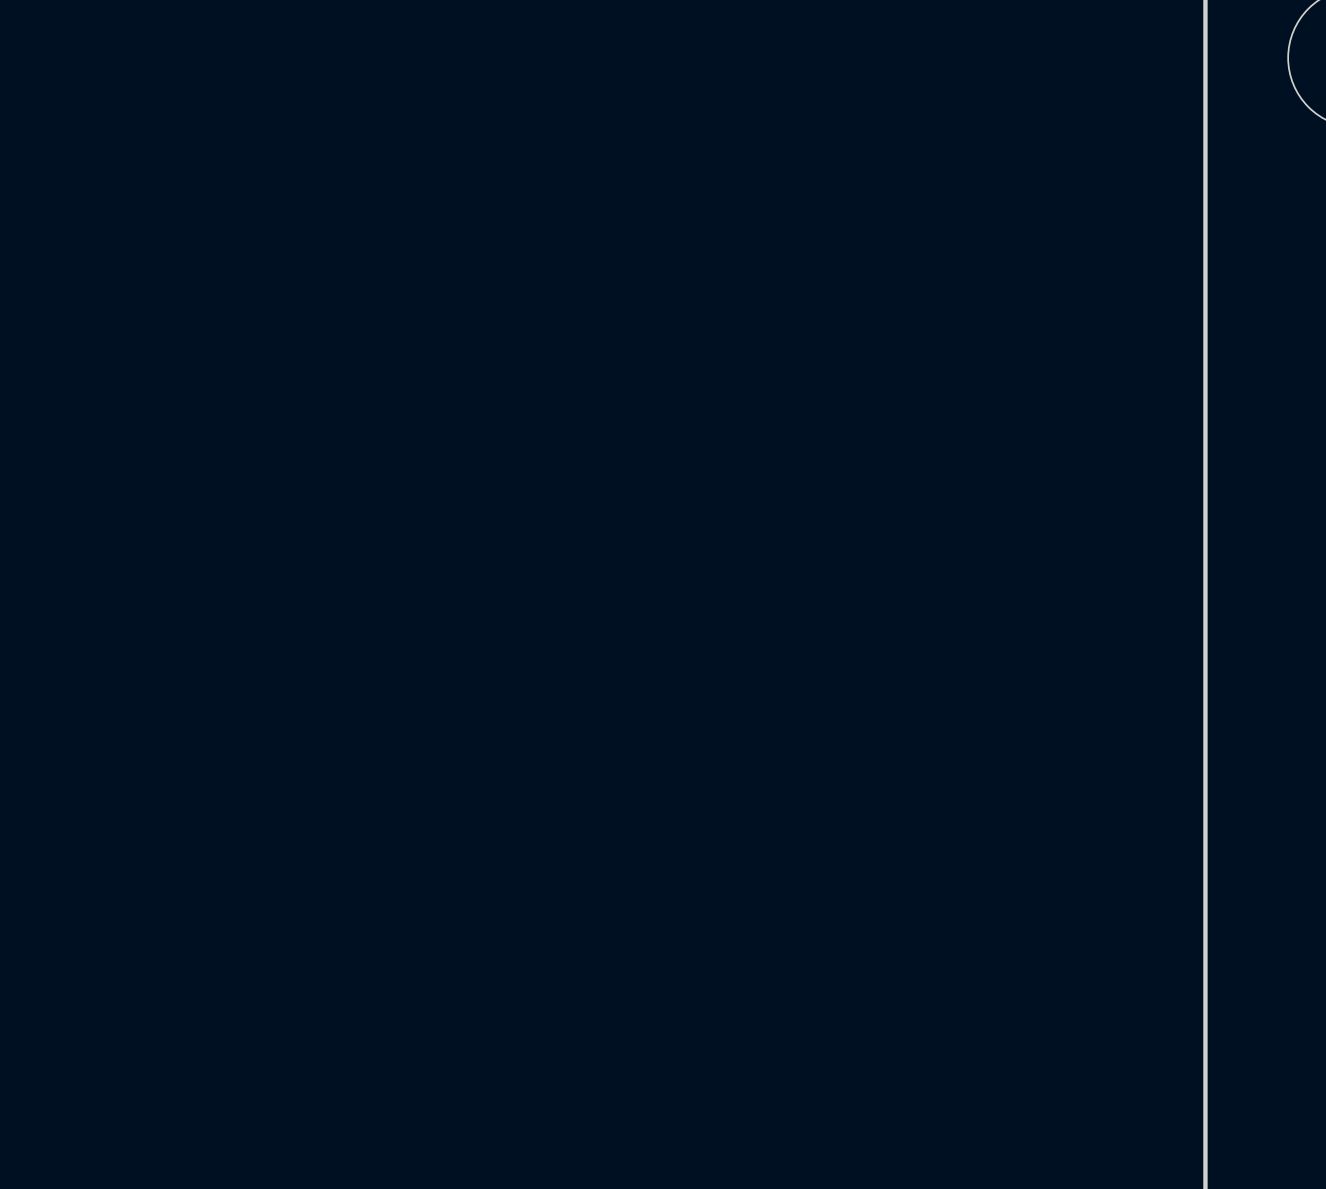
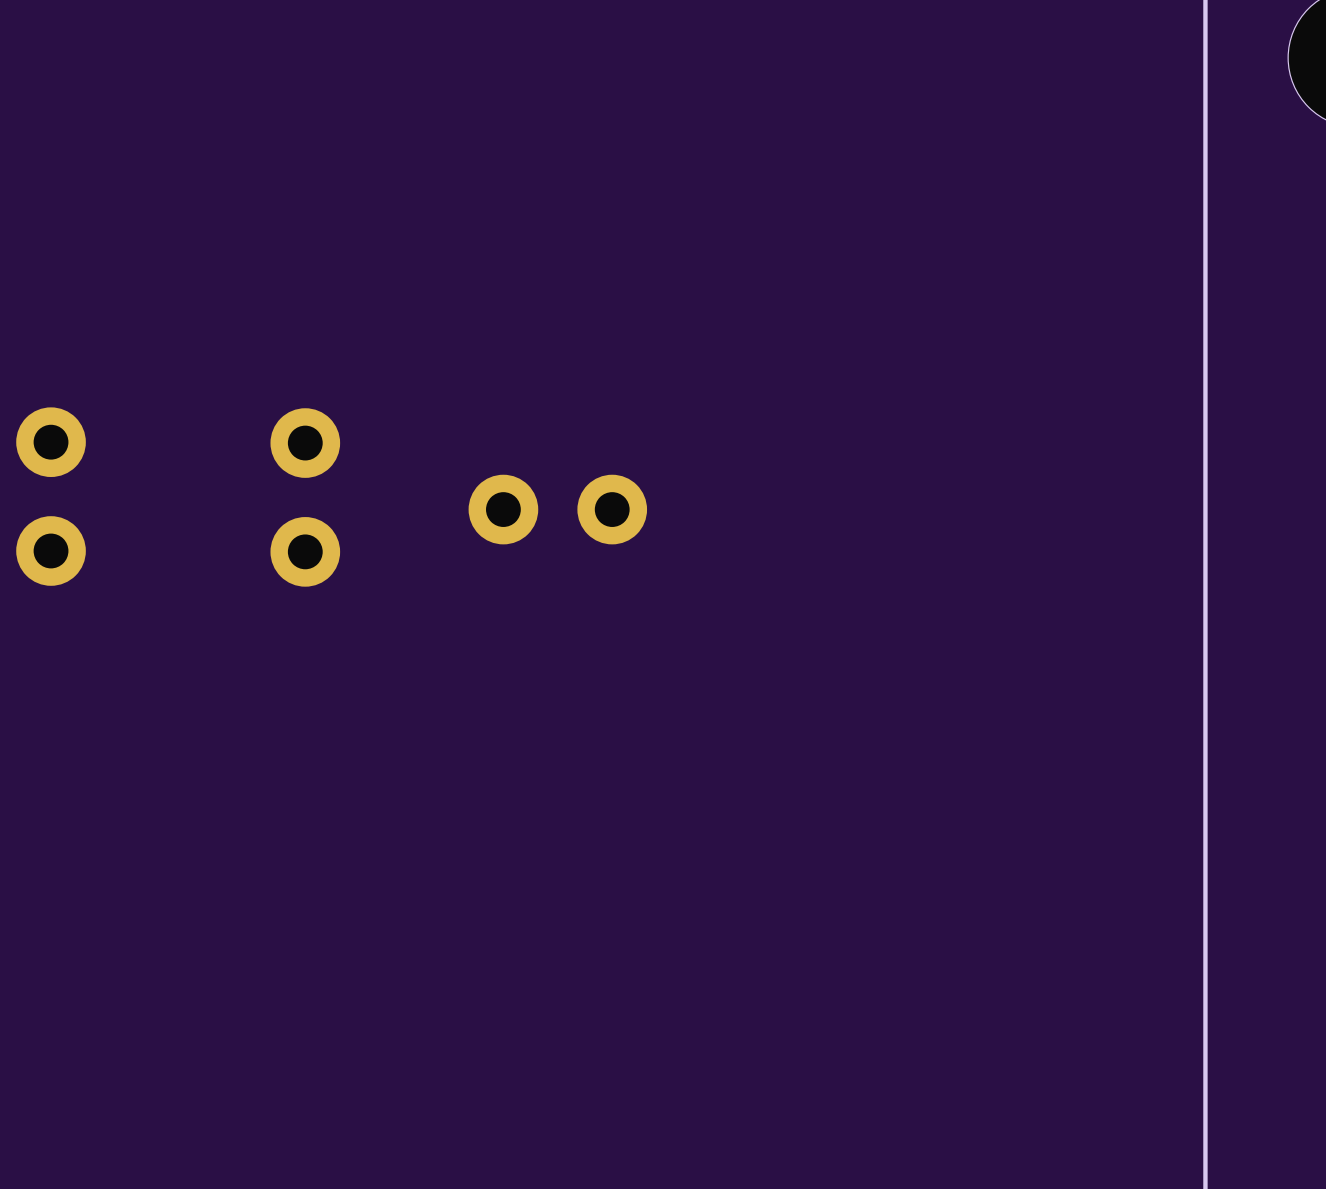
part: none -> (51, 496)
part: none -> (305, 497)
part: none -> (557, 509)

